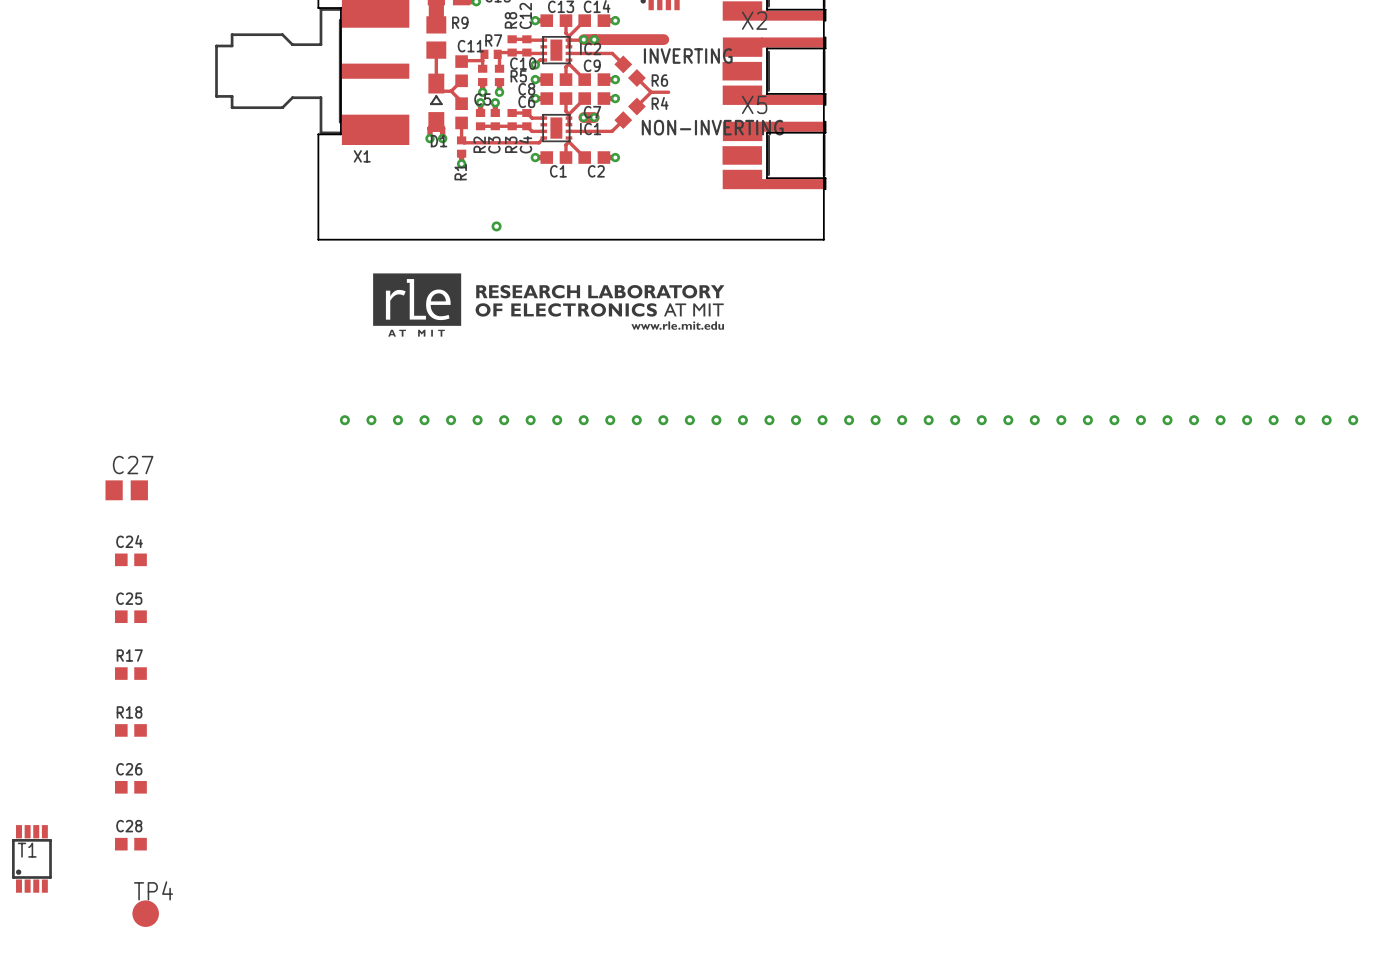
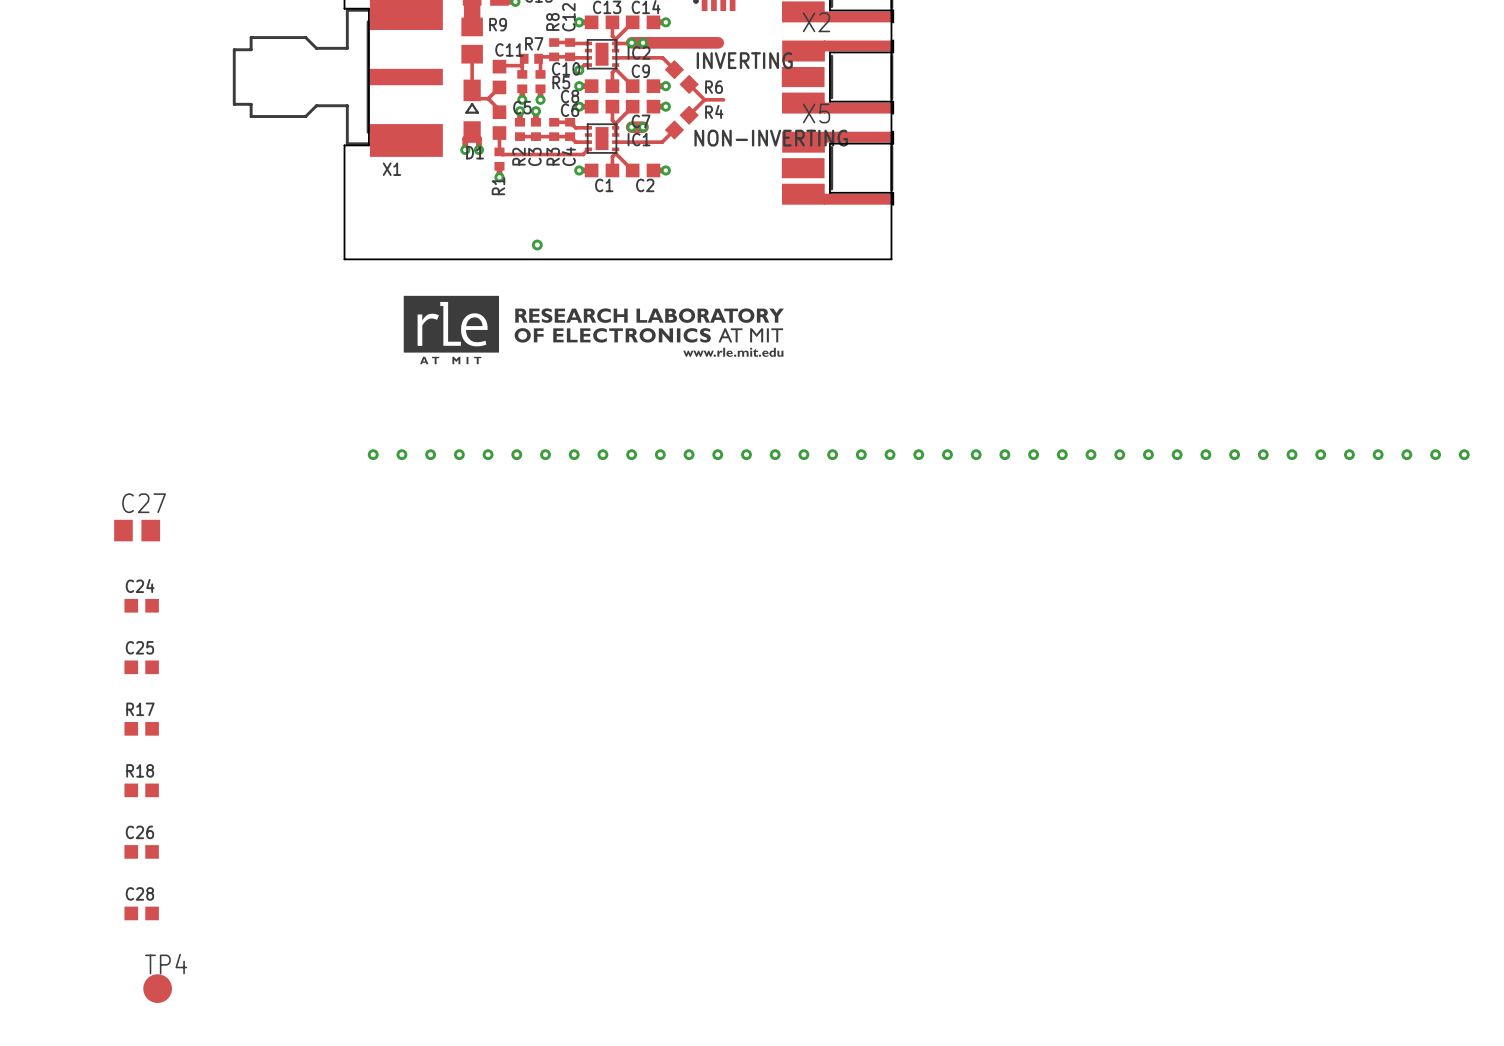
T1: (31, 858) -> none

